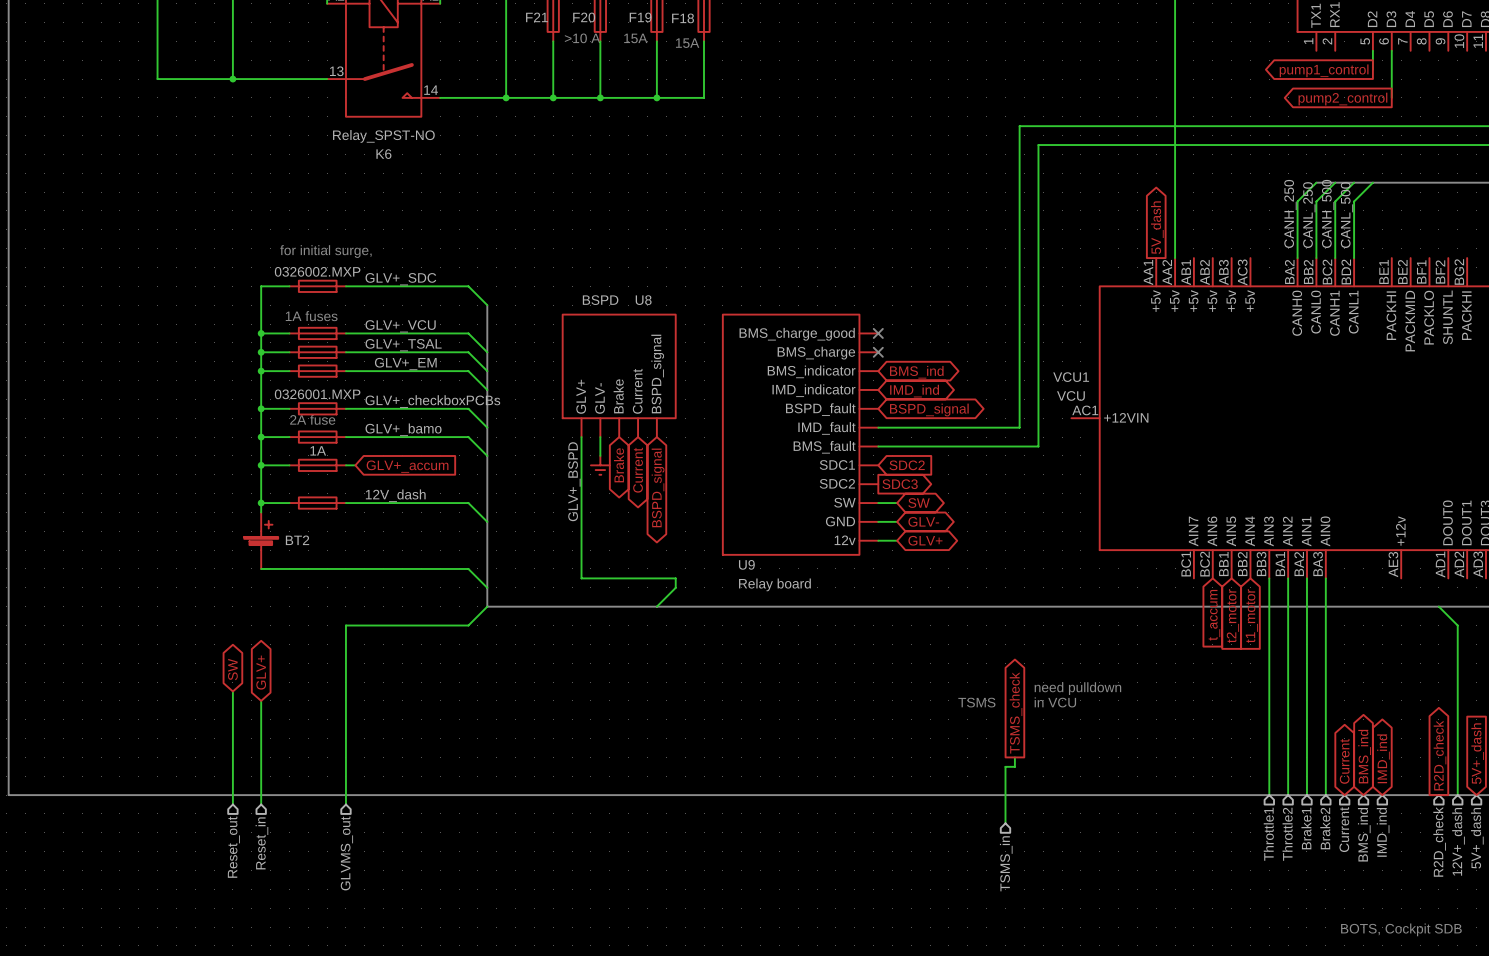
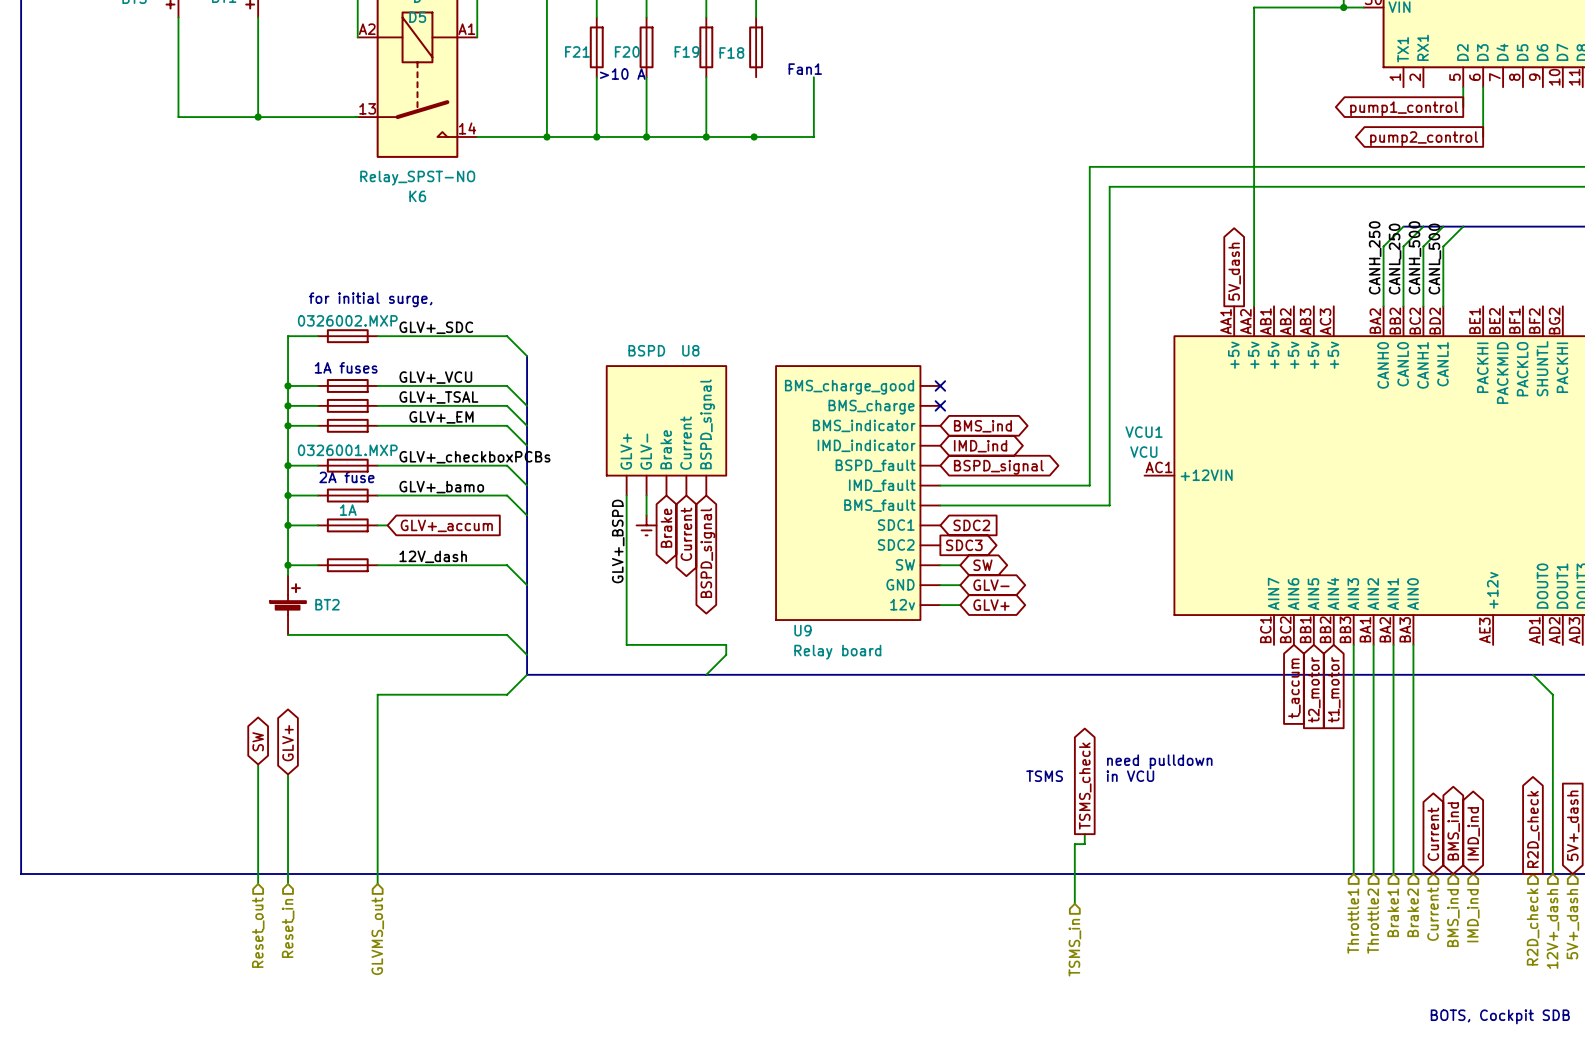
text: none -> Fan1 (805, 69)
text: 15A (635, 38) -> none
wire: (704, 41) (704, 97) -> (813, 77) (813, 136) (756, 136)
text: 15A (687, 43) -> none
junction: none -> (754, 136)

